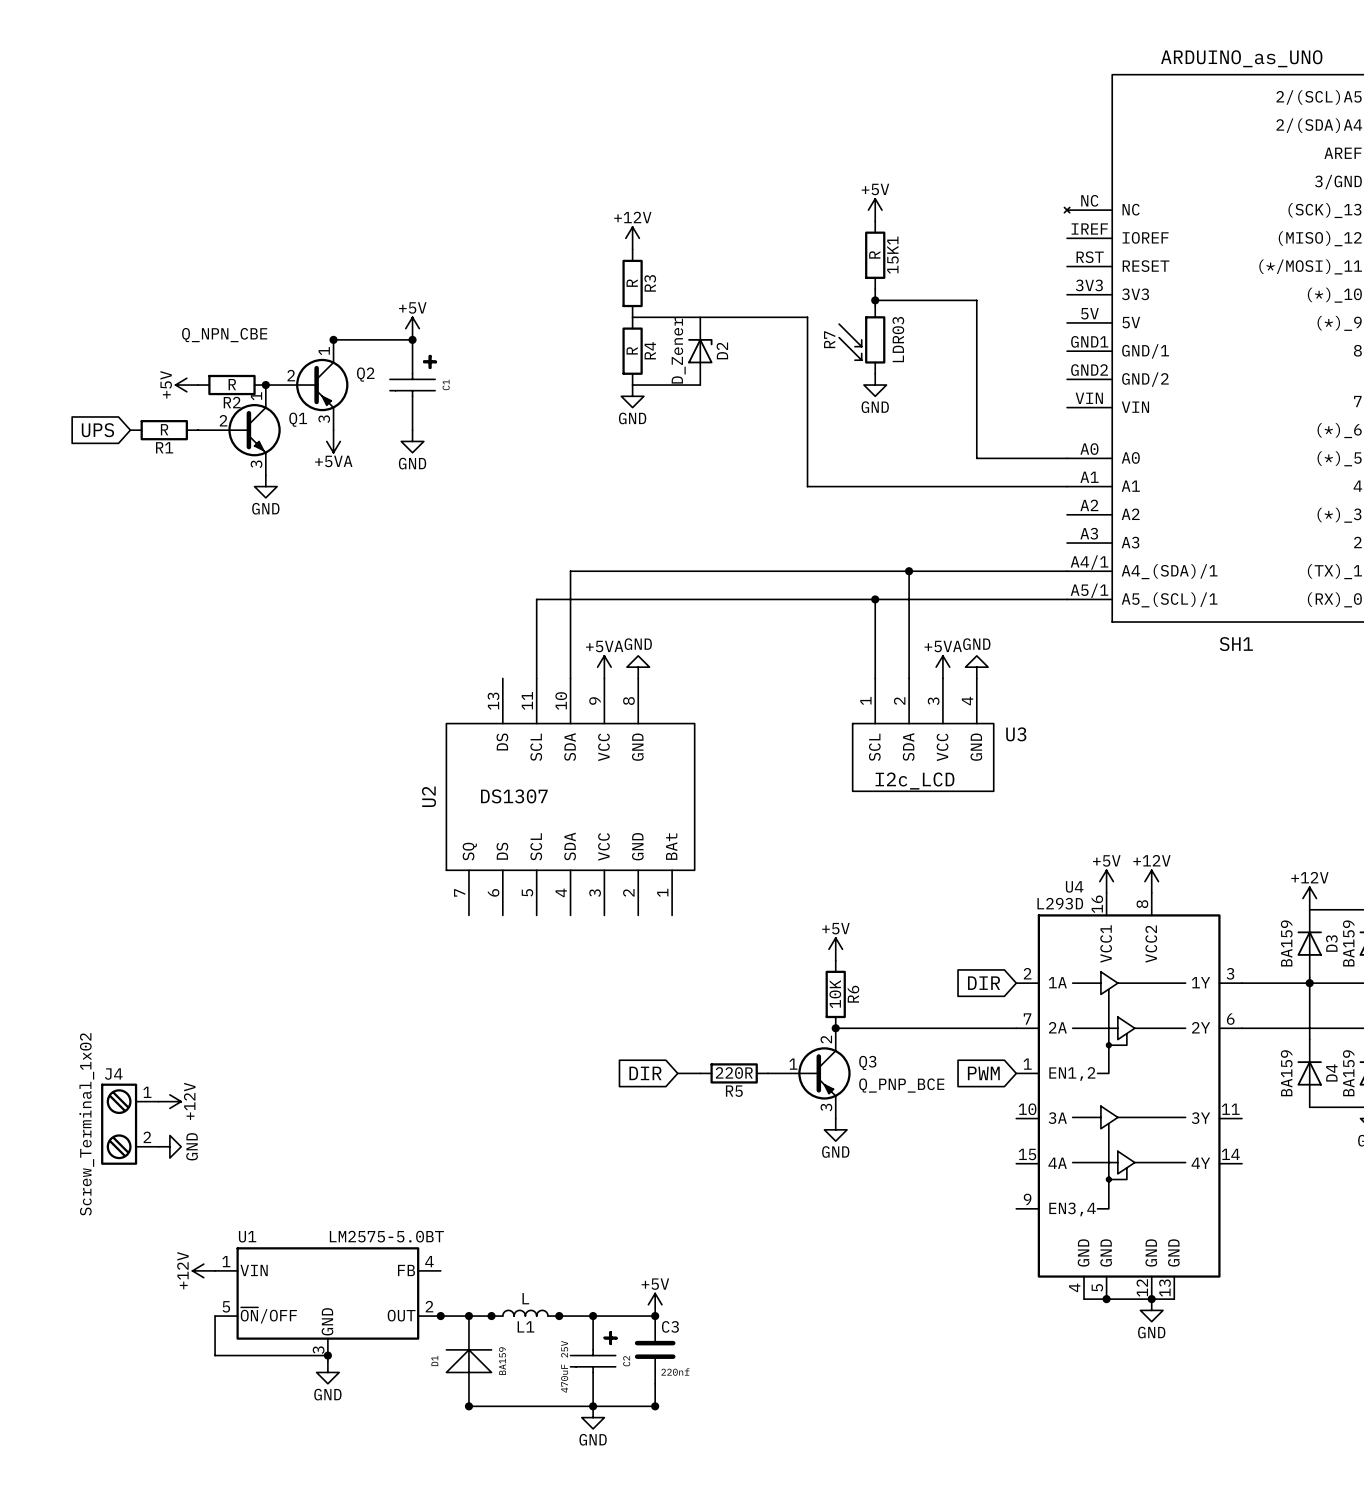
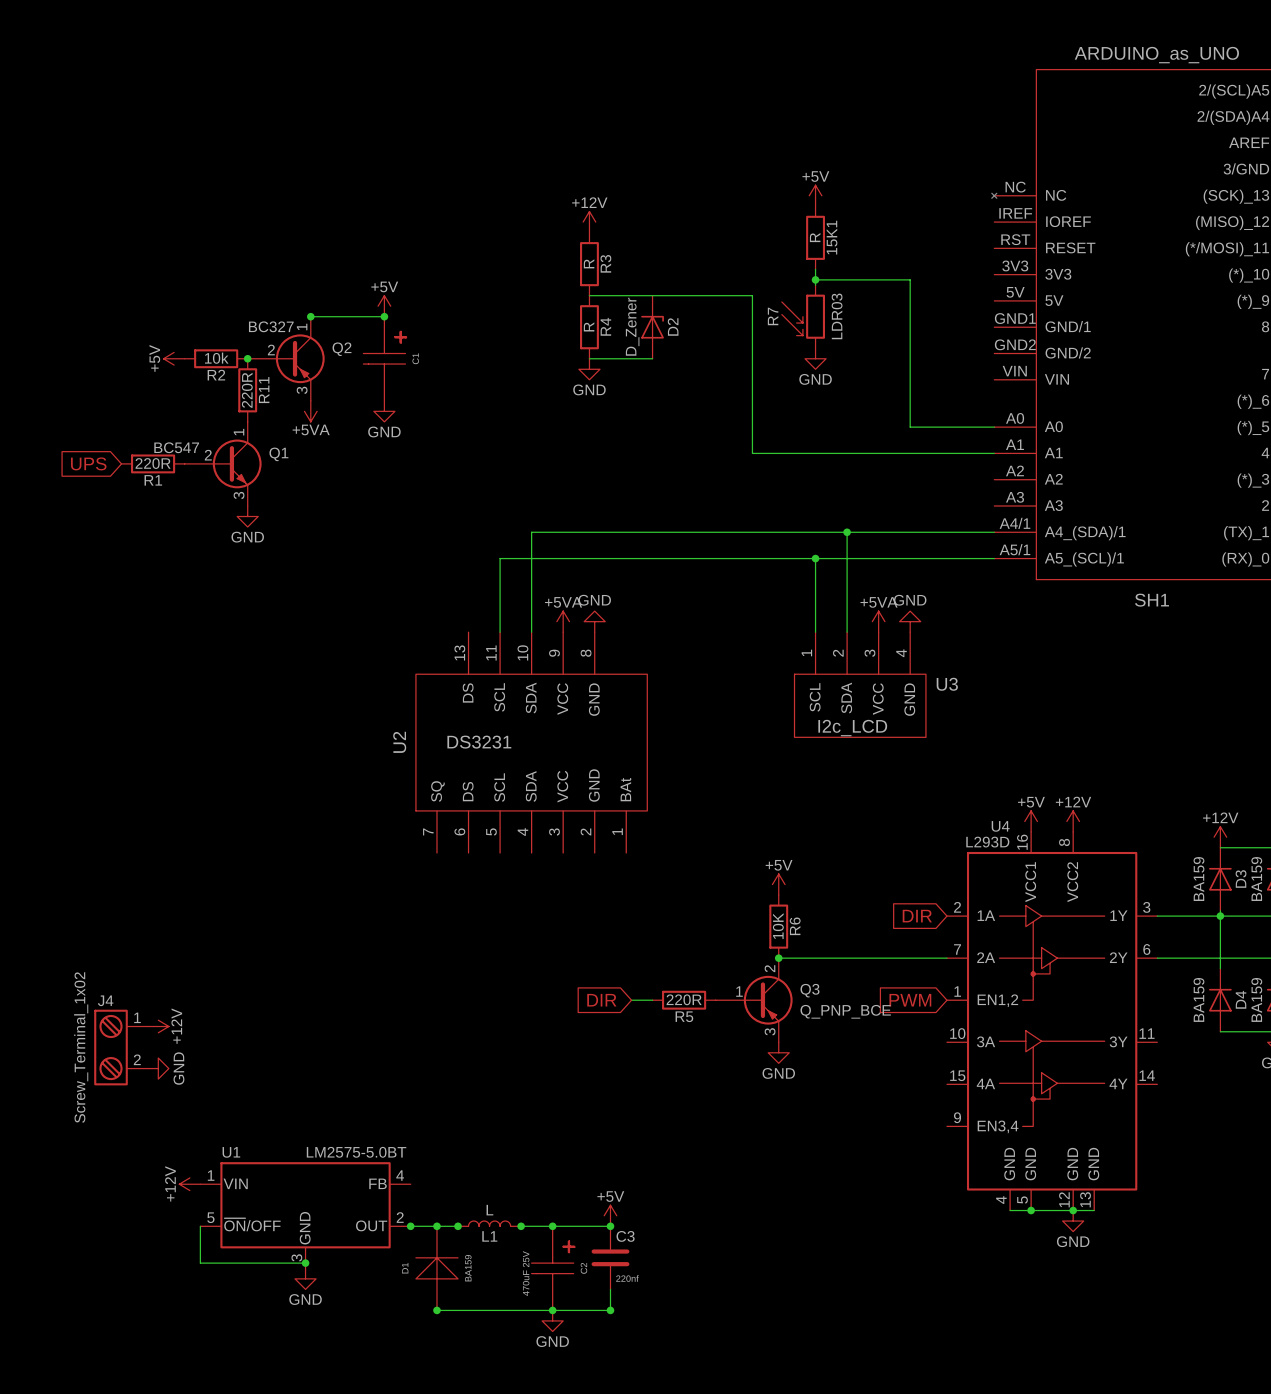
Q1 value: Q_NPN_CBE (224, 335) -> BC547 (176, 447)
Q2 value: none -> BC327 (271, 326)
R2 value: R (232, 384) -> 10k (216, 358)
R11: none -> 220R (247, 390)
R1 value: R (164, 429) -> 220R (153, 463)
global label position: UPS (97, 430) -> UPS (88, 463)
R1 position: (164, 430) -> (153, 463)
Q1 position: (239, 430) -> (223, 463)
power symbol position: GND (265, 486) -> GND (247, 516)
U2 value: DS1307 (514, 796) -> DS3231 (479, 742)

